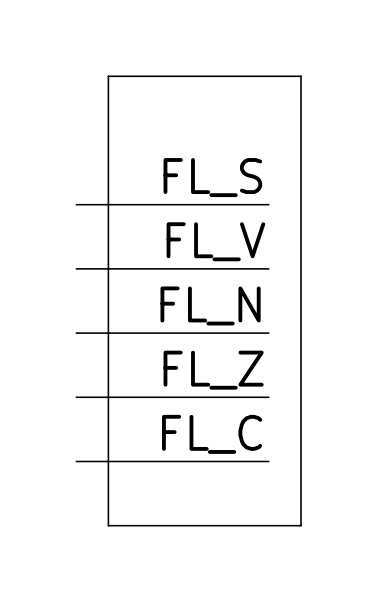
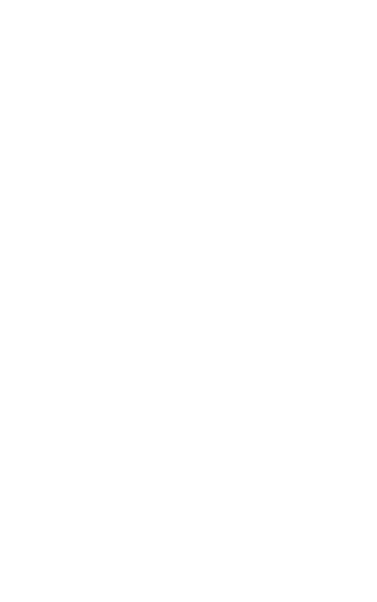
line: (108, 76) (300, 76) (300, 525) (108, 525) (108, 76) -> none
label: FL_S (212, 177) -> none
wire: (76, 204) (268, 204) -> none
label: FL_V (215, 241) -> none
wire: (76, 268) (268, 268) -> none
label: FL_N (210, 305) -> none
wire: (76, 333) (268, 333) -> none
label: FL_Z (213, 370) -> none
wire: (76, 397) (268, 397) -> none
label: FL_C (212, 434) -> none
wire: (76, 461) (268, 461) -> none

